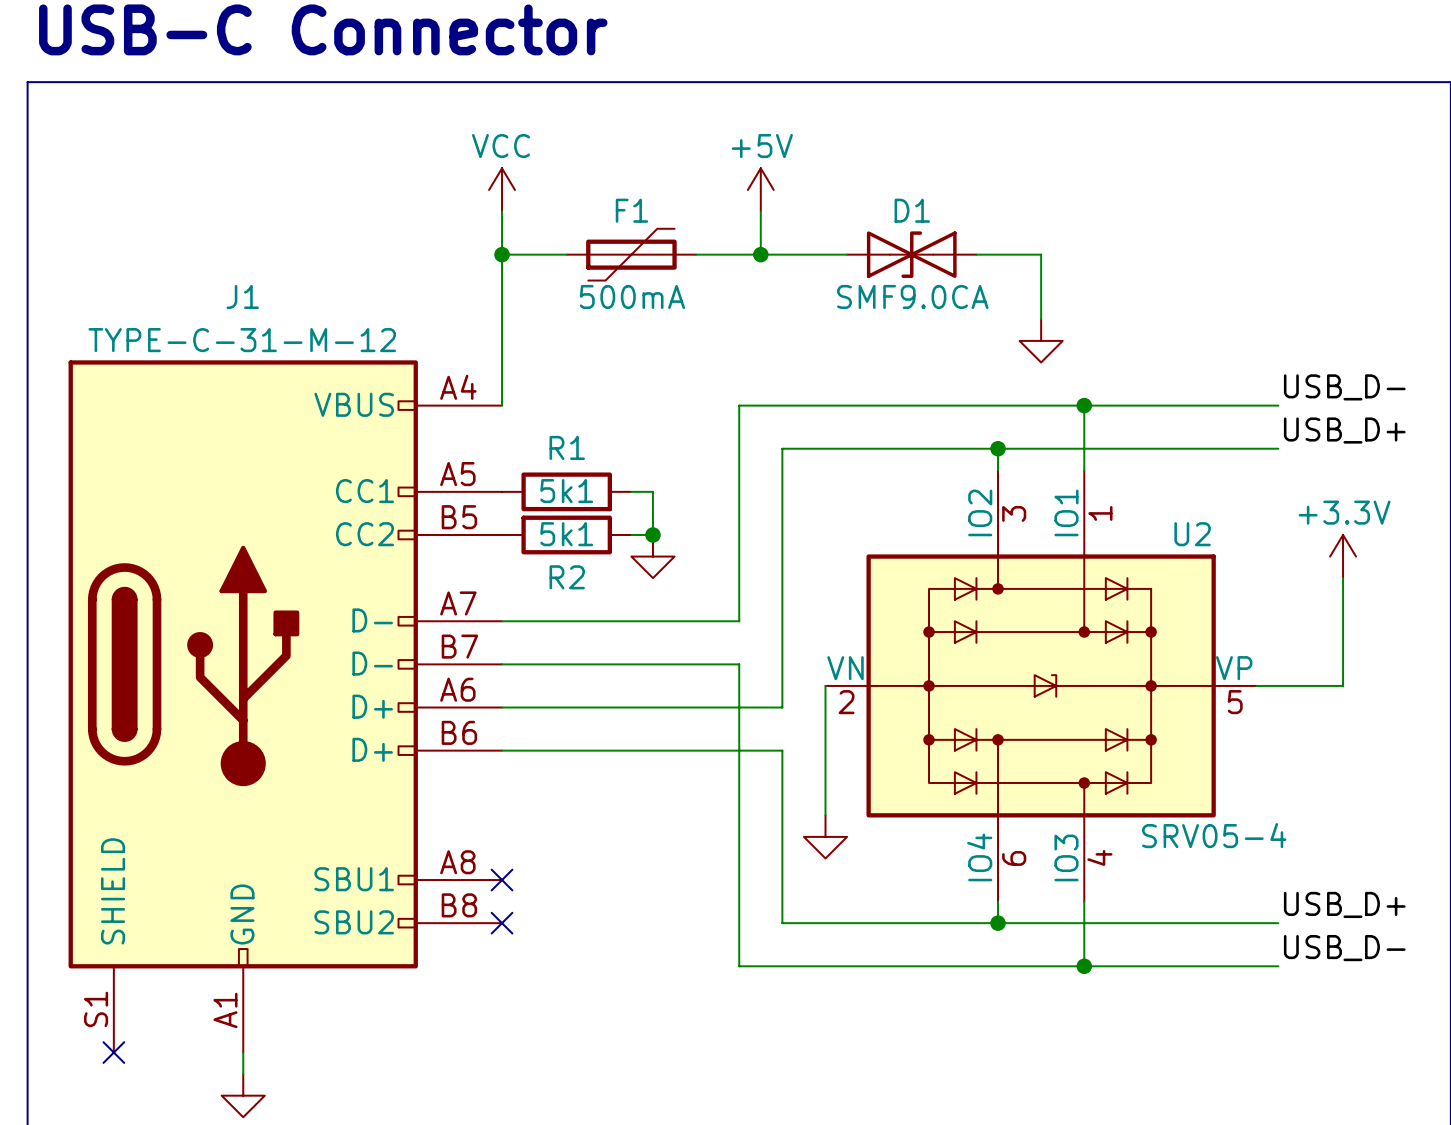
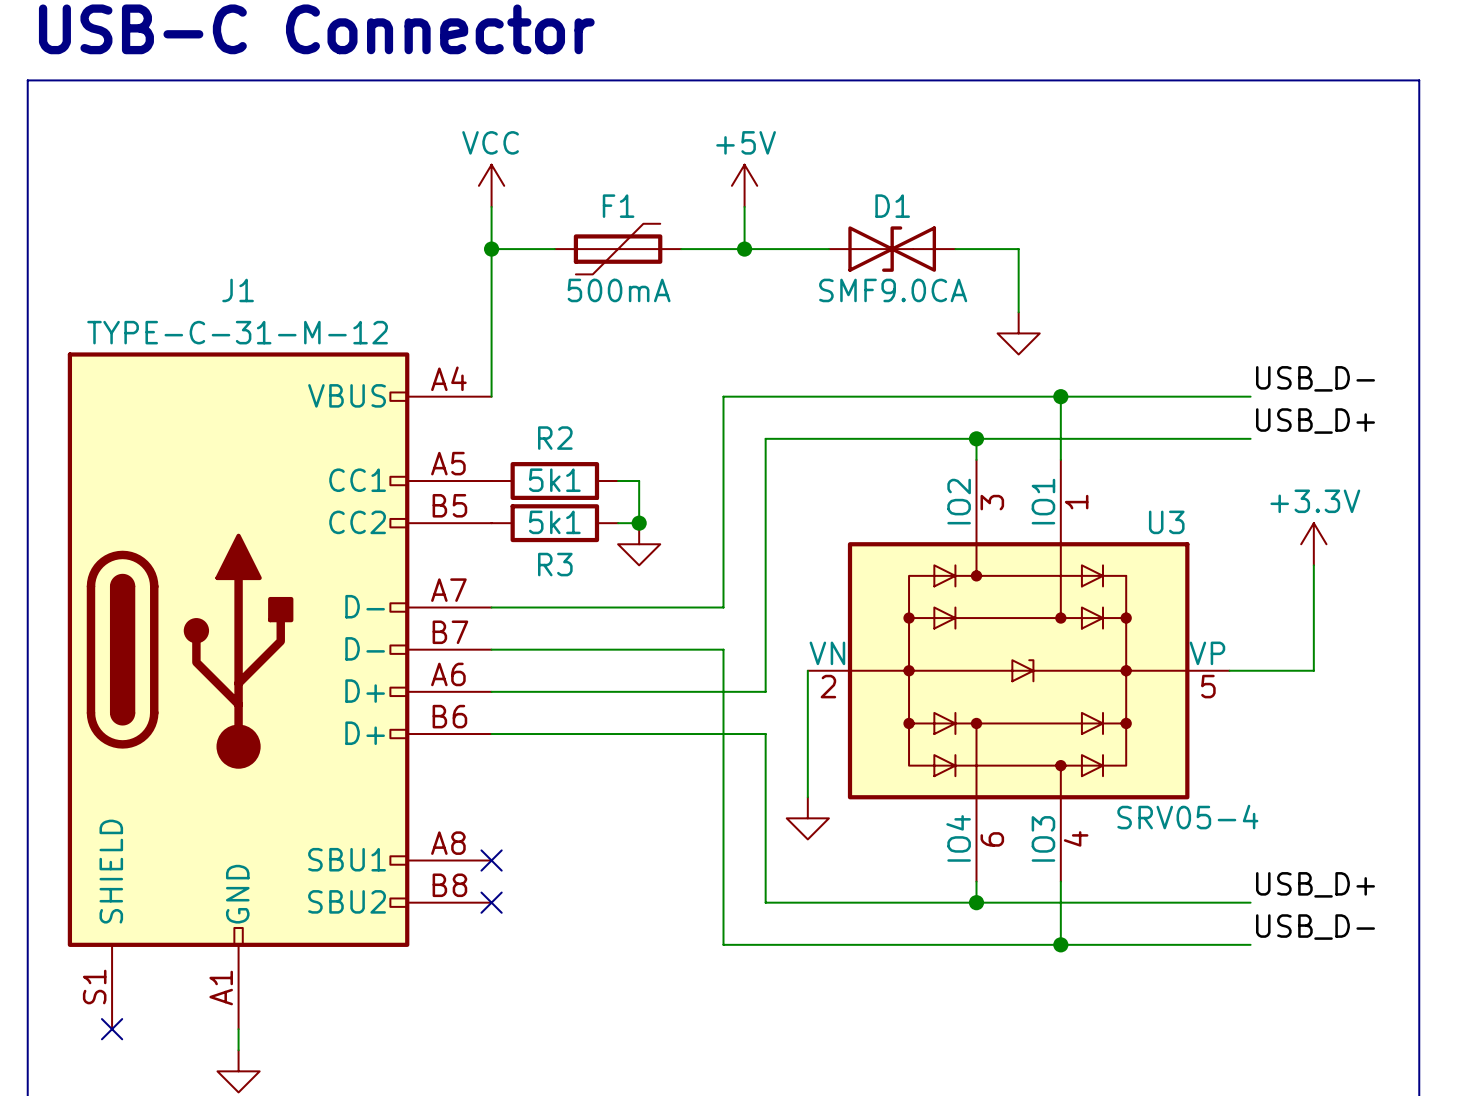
R1 name: R1 (567, 447) -> R2 (555, 438)
U2 name: U2 (1192, 534) -> U3 (1166, 522)
R2 name: R2 (567, 577) -> R3 (555, 564)

